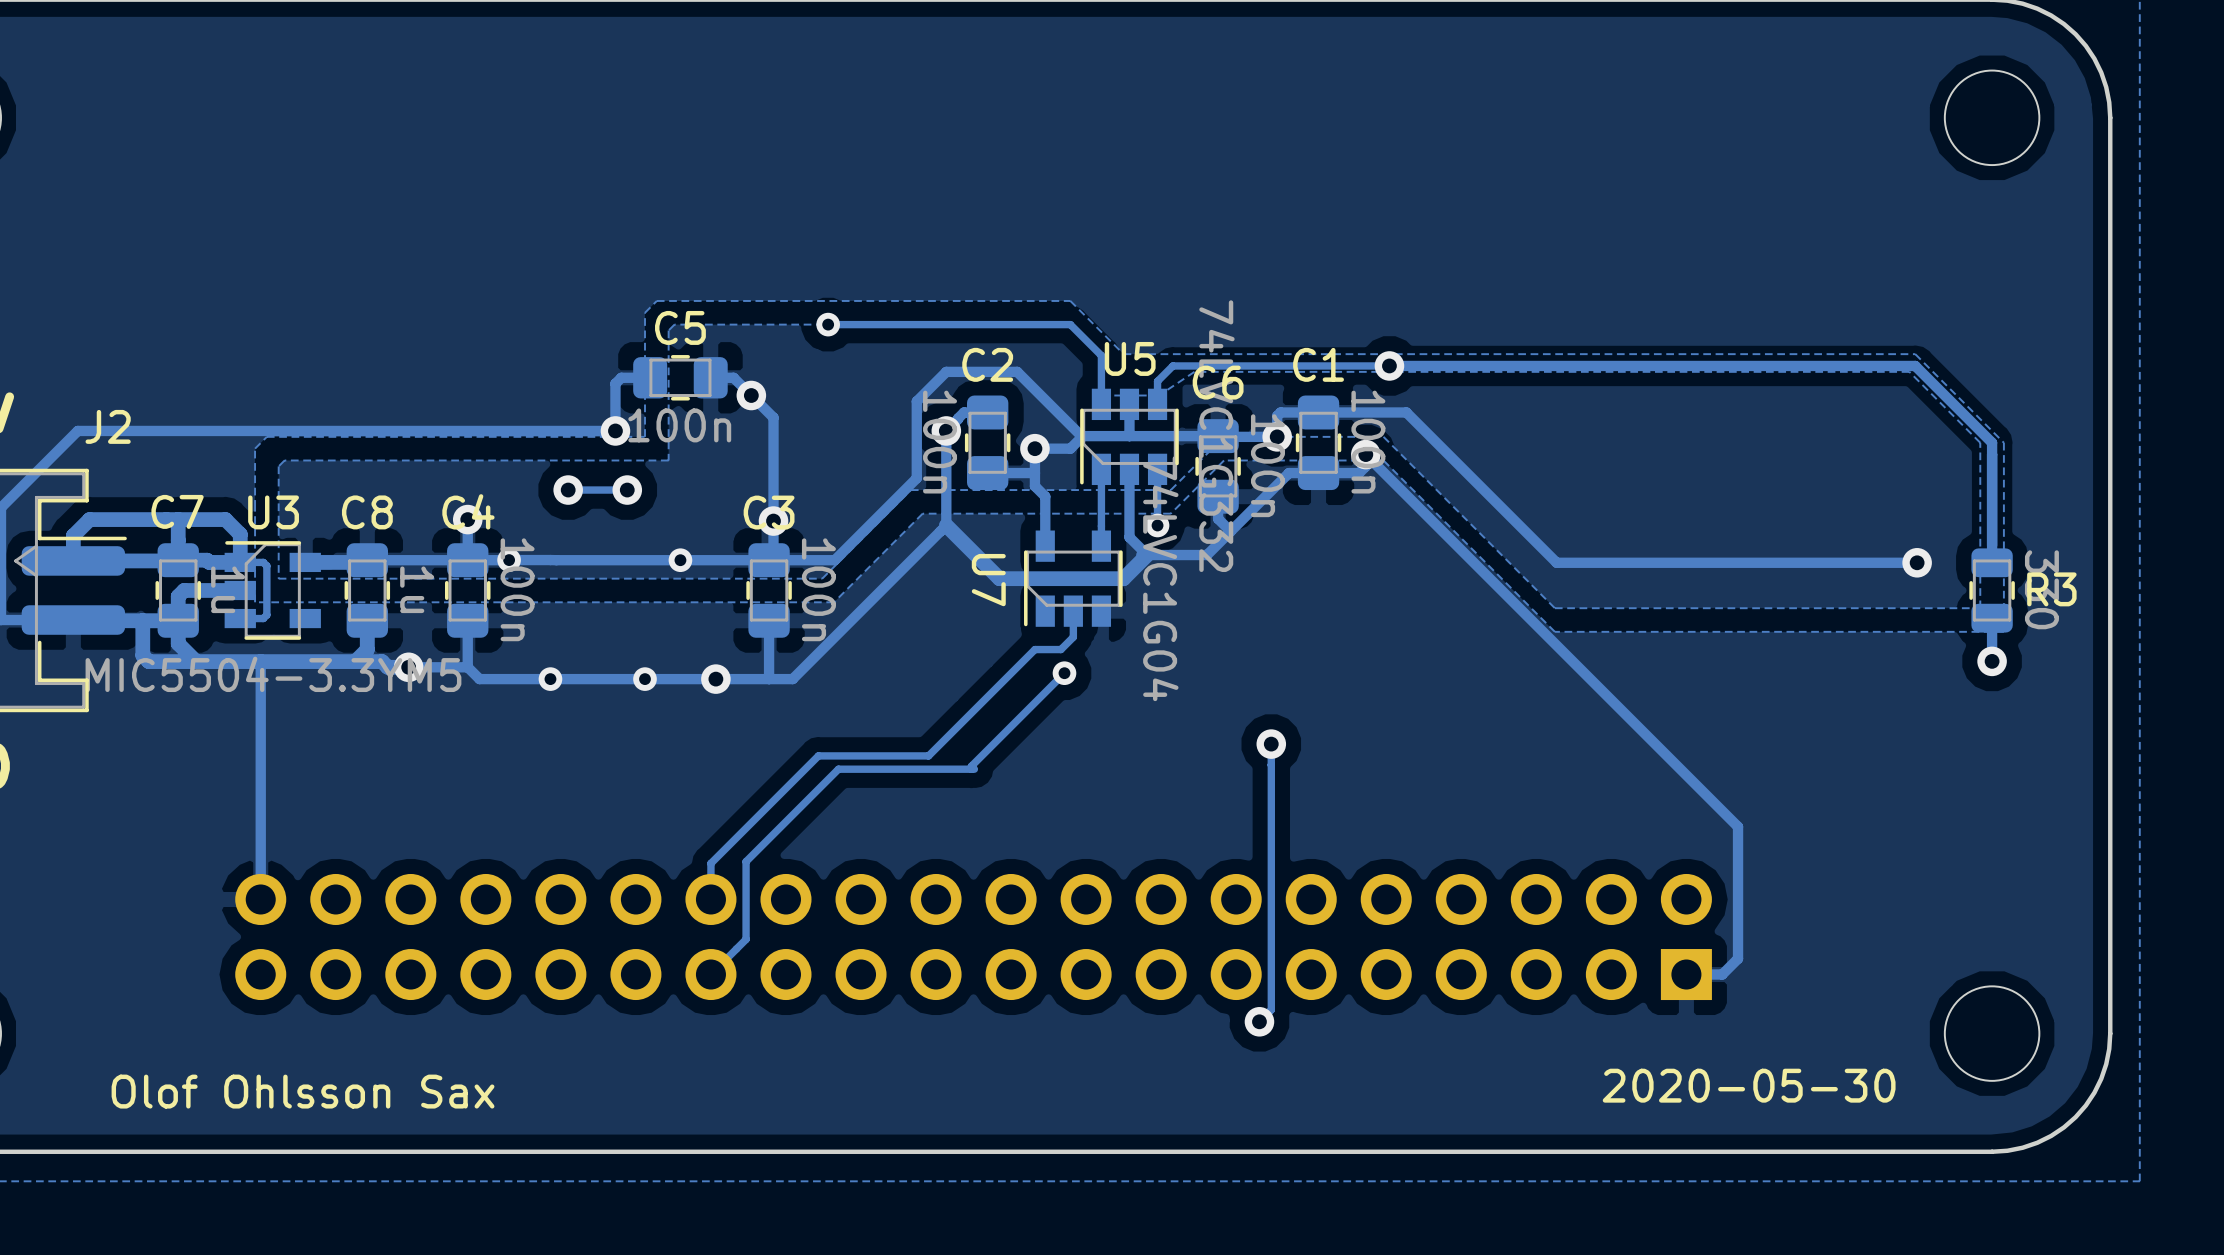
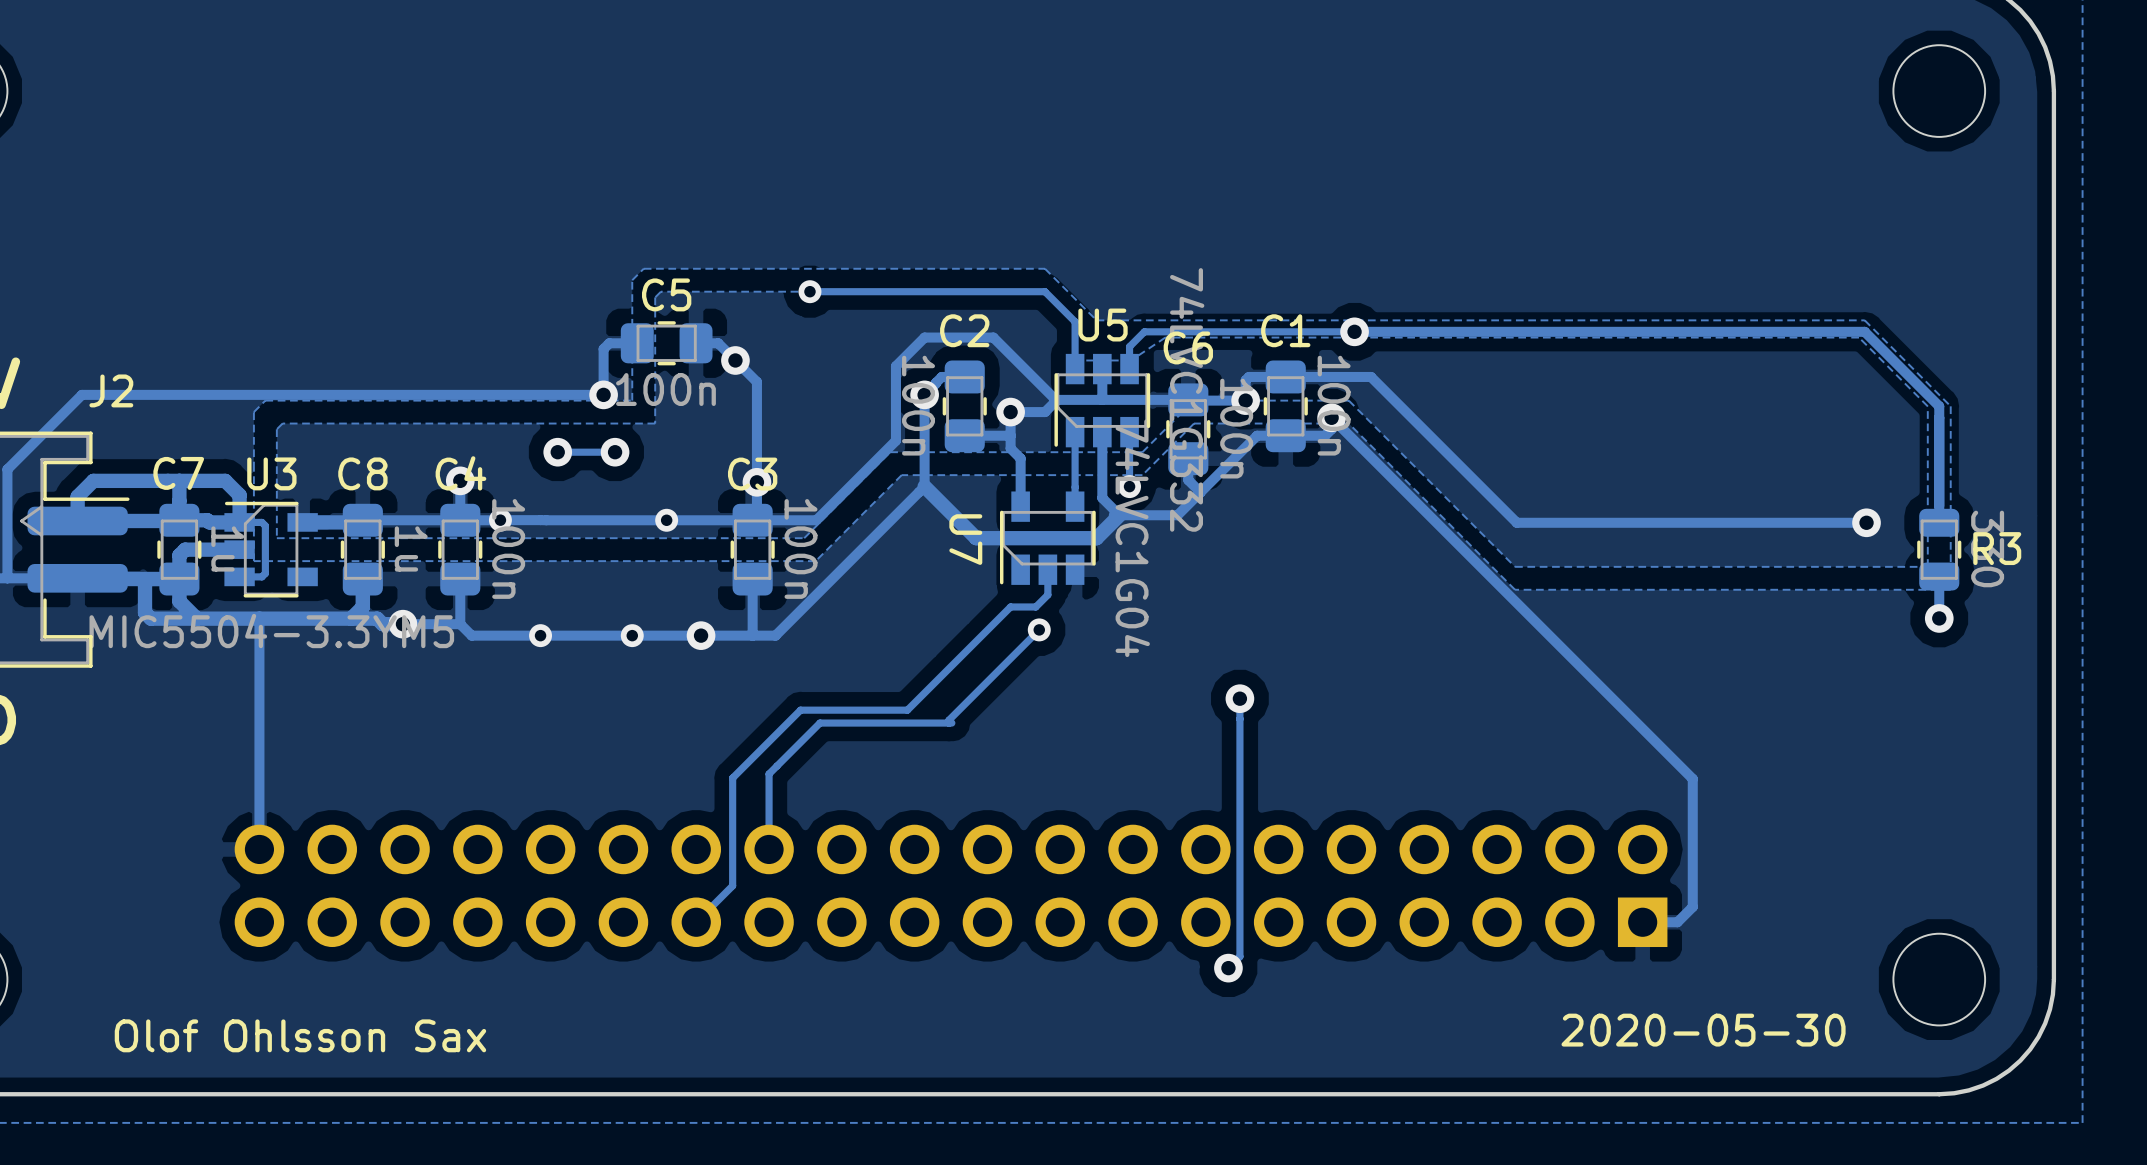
track: (785, 821) (746, 861) (746, 939) -> (732, 778) (732, 885) (730, 888)
track: none -> (769, 774) (769, 849)
track: (748, 825) (710, 863) (710, 899) -> none

